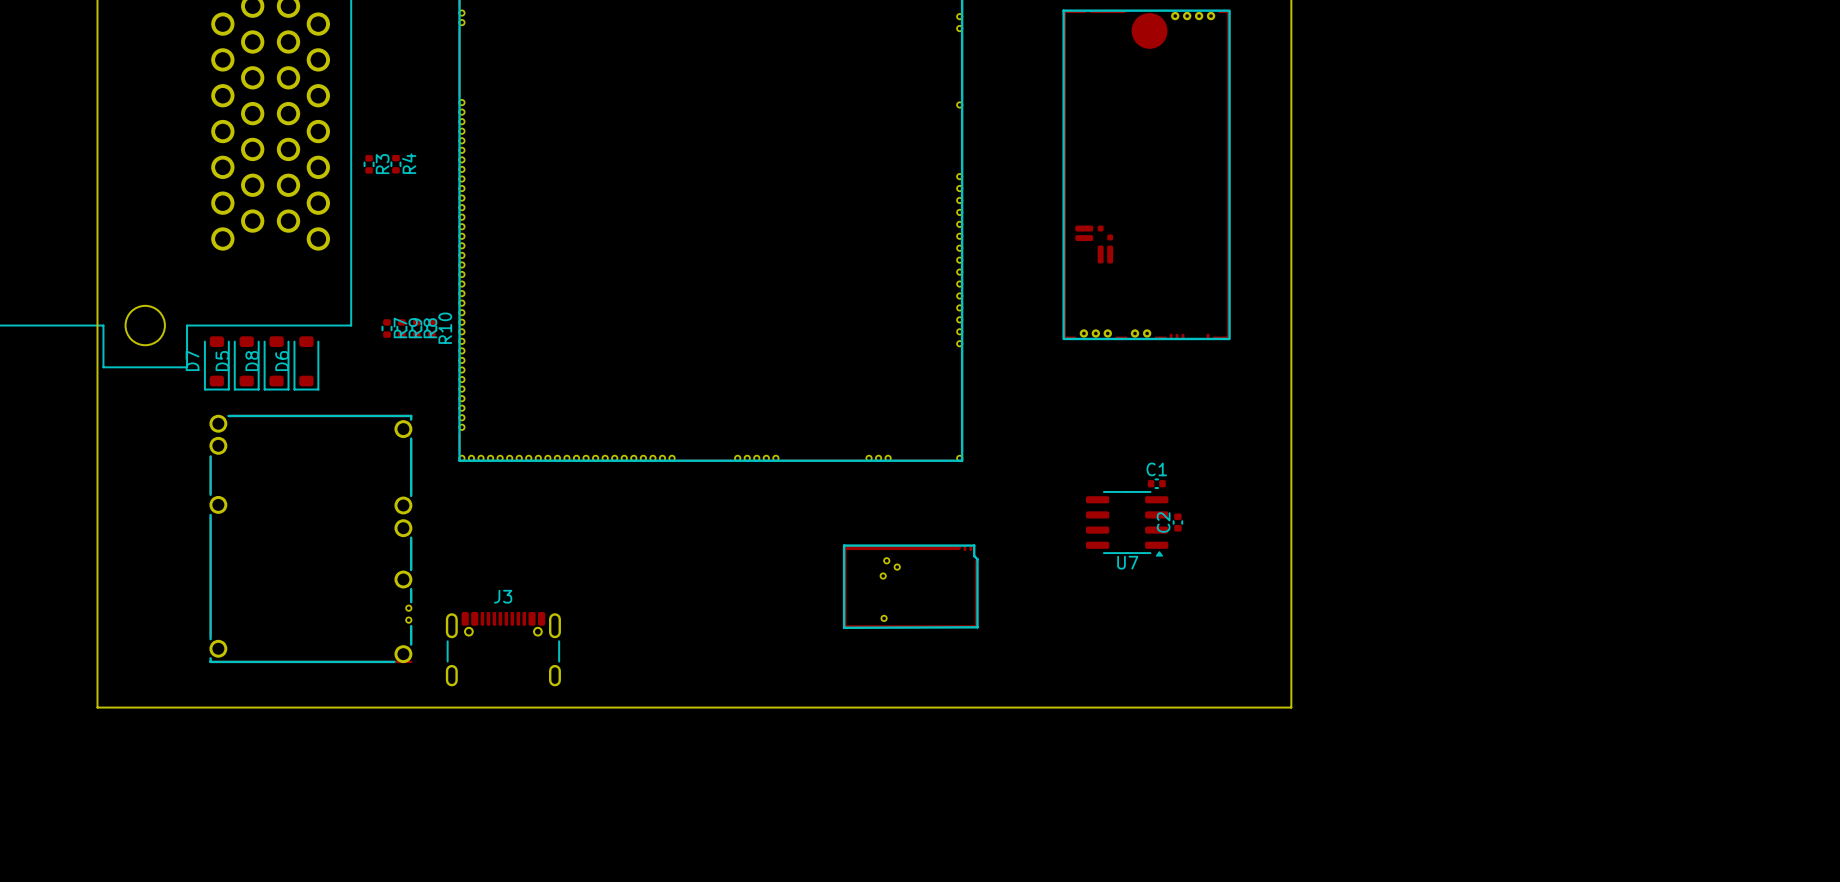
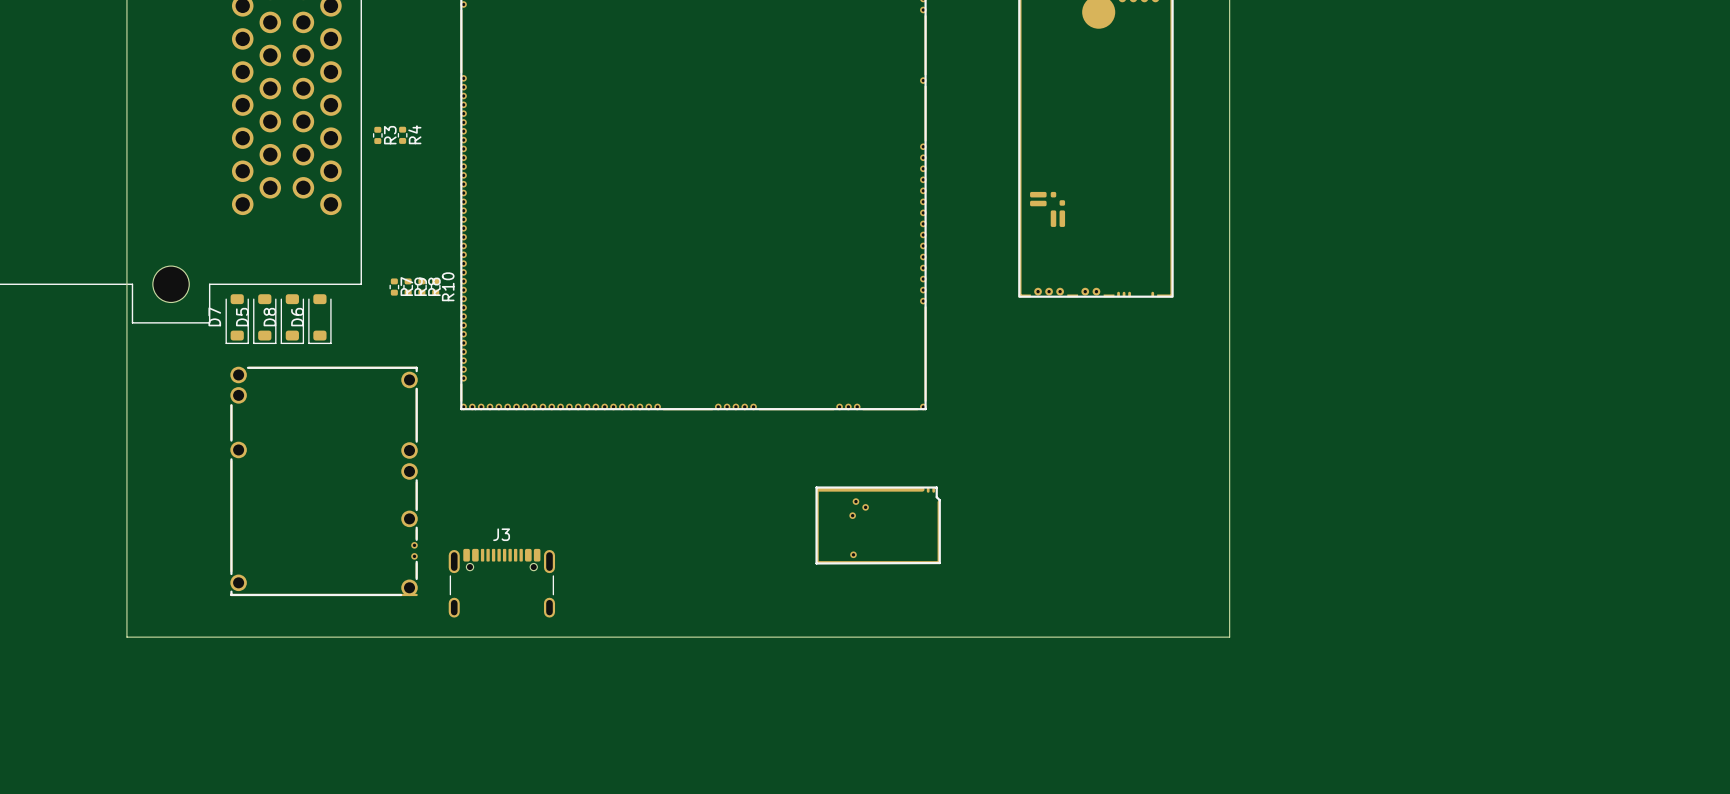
C1: (1156, 483) -> none
C2: (1177, 522) -> none
U7: (1127, 523) -> none

